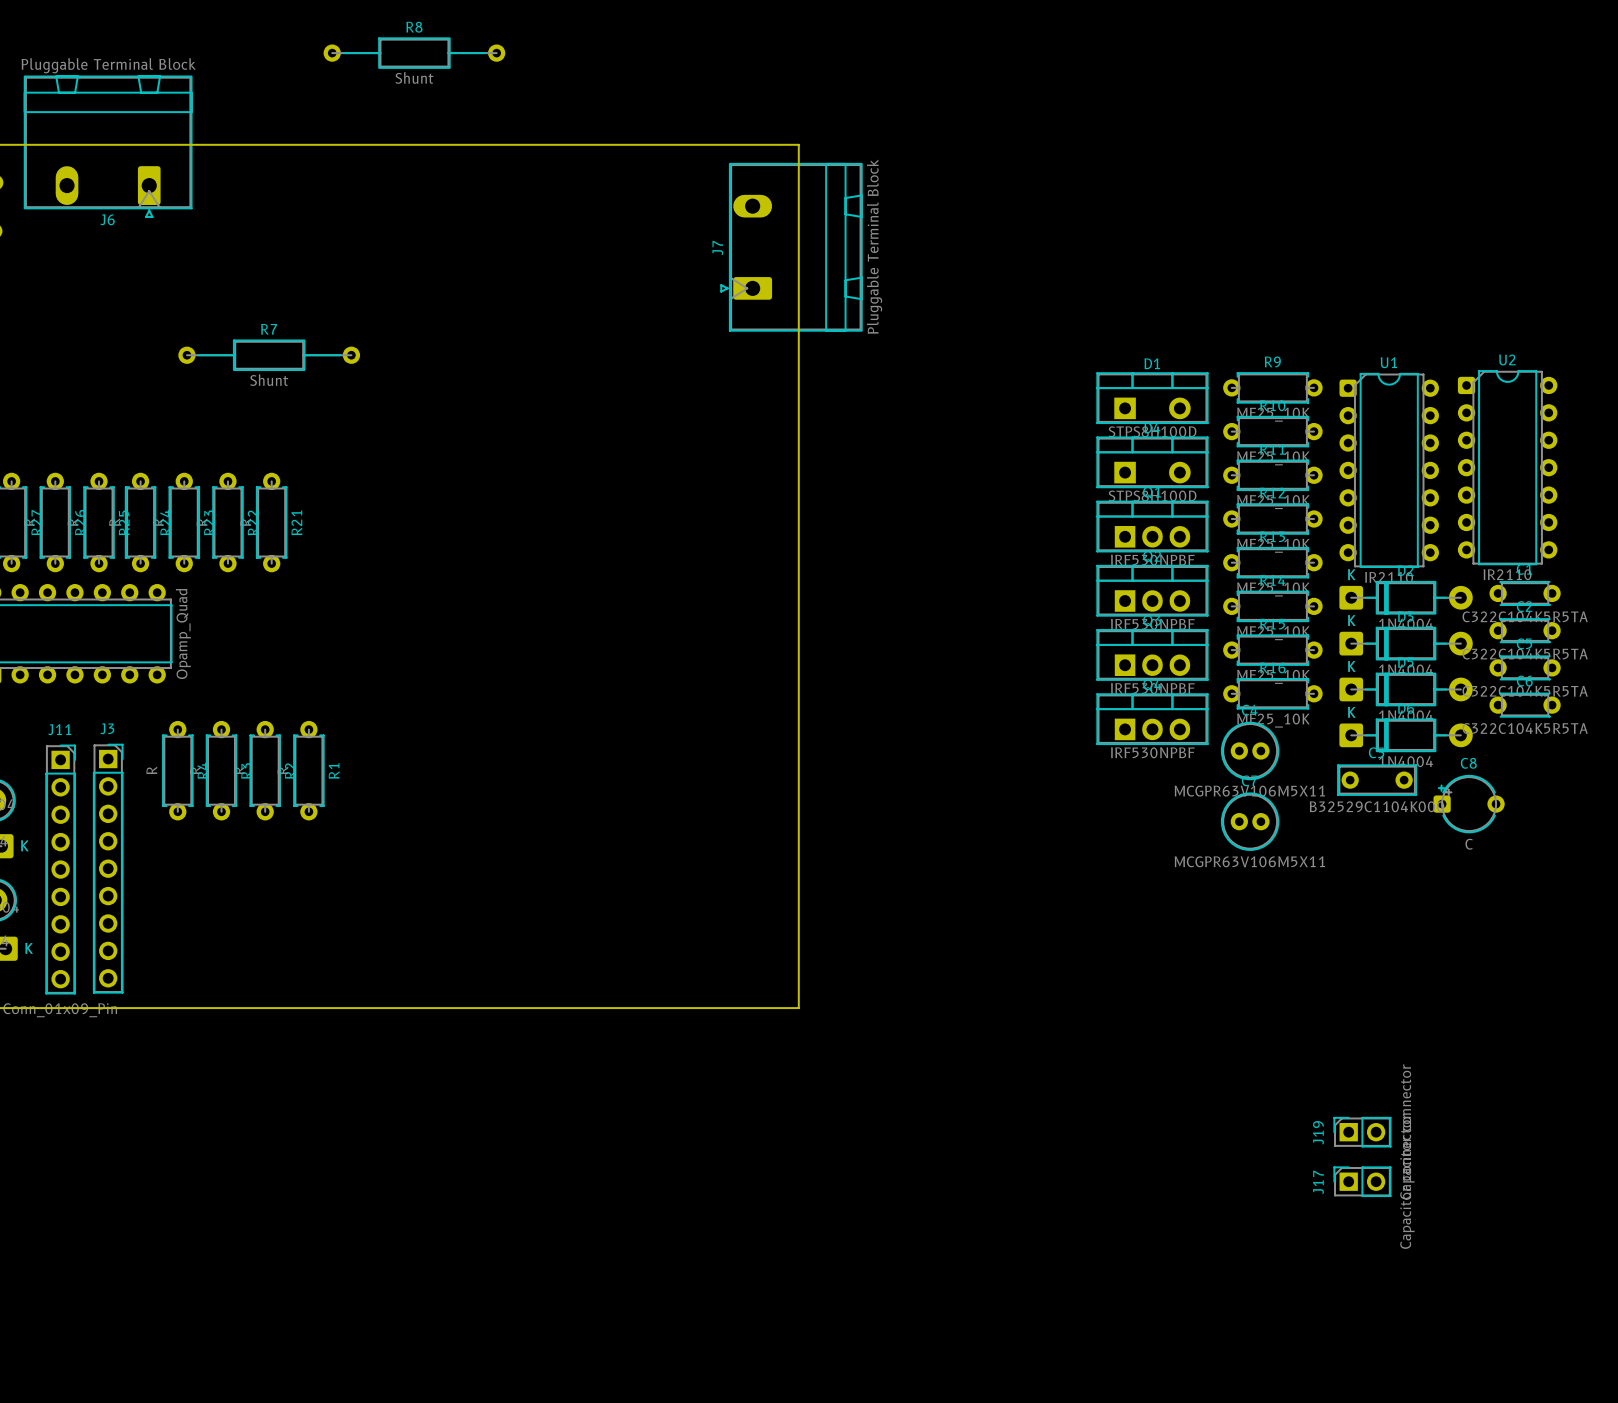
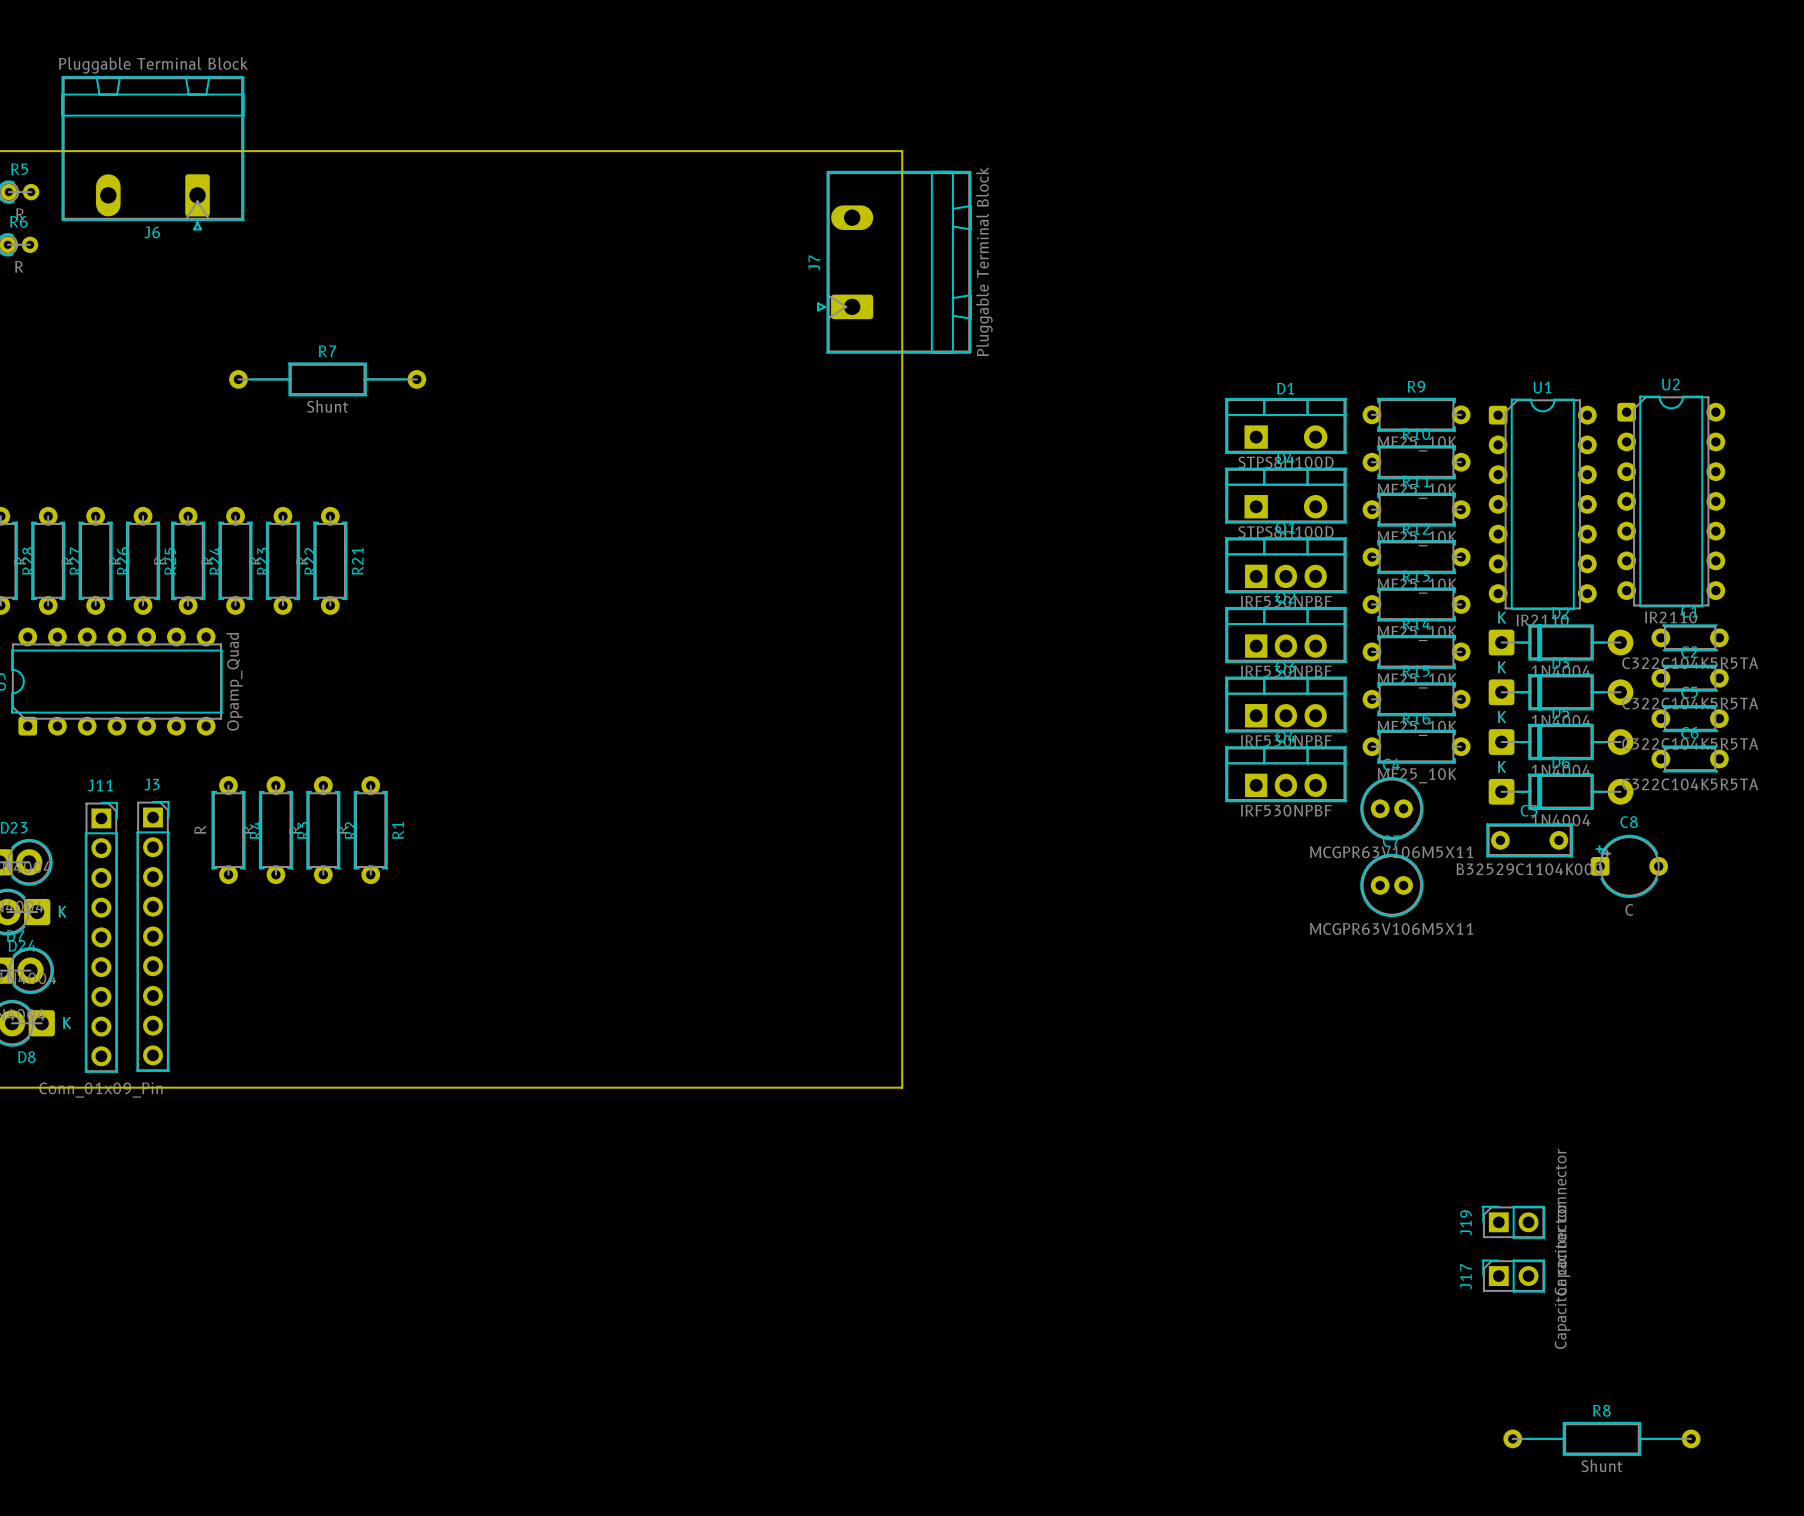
R8 position: (414, 53) -> (1601, 1438)

